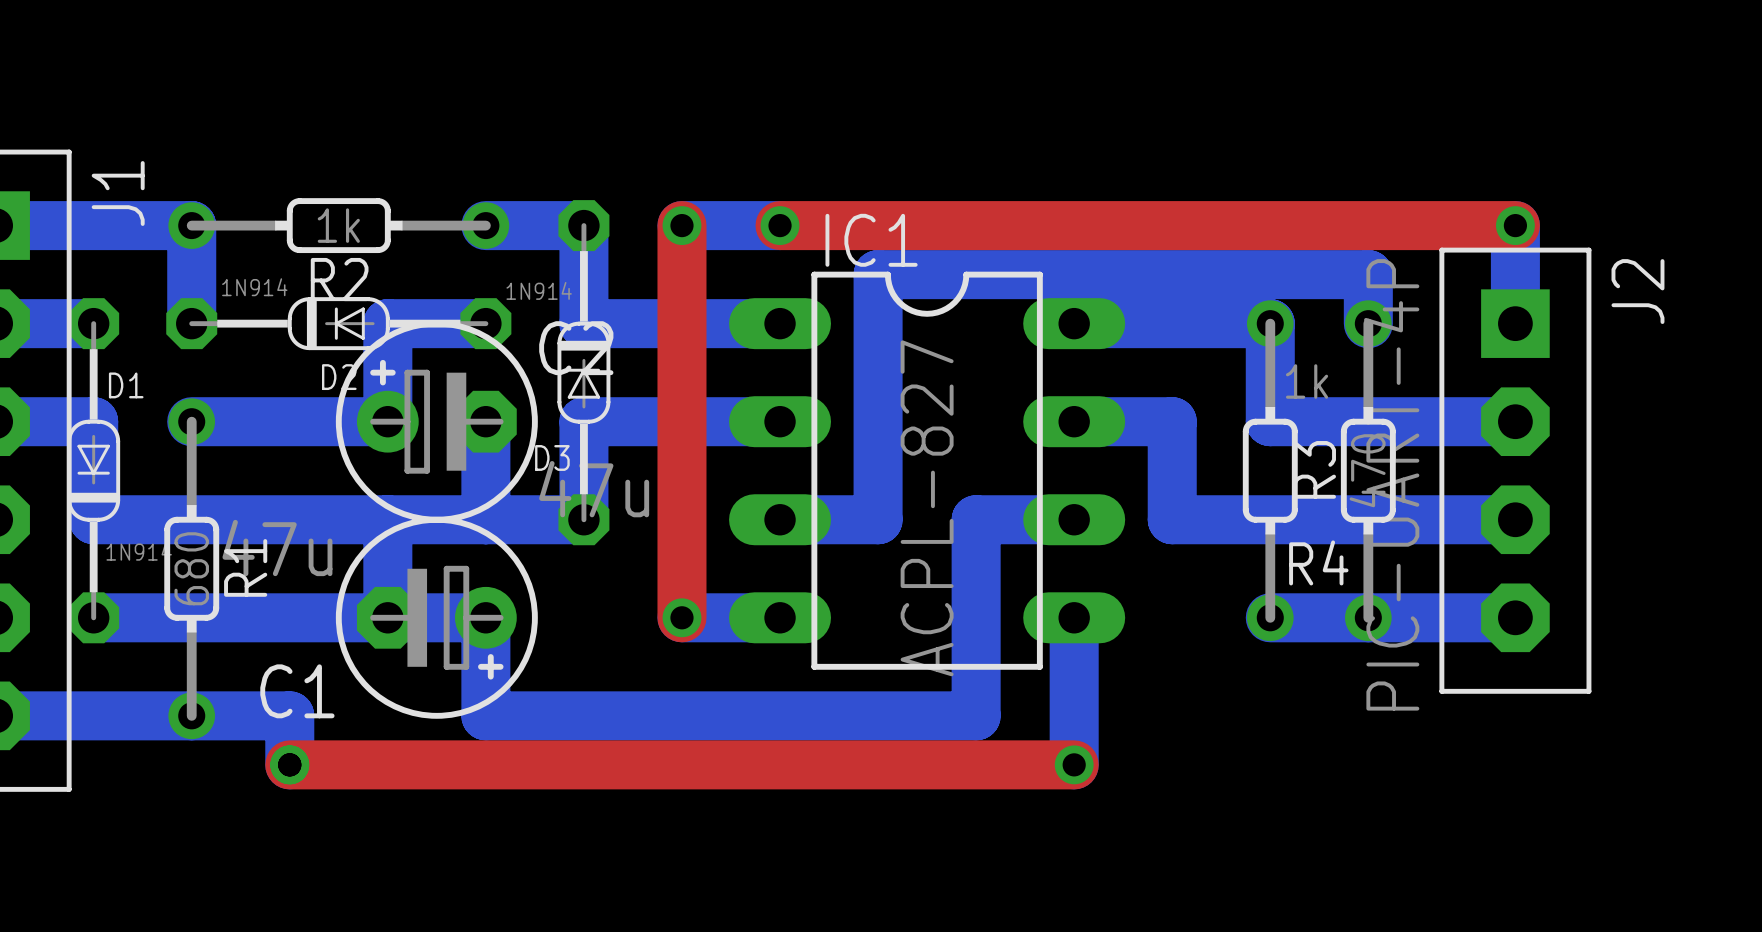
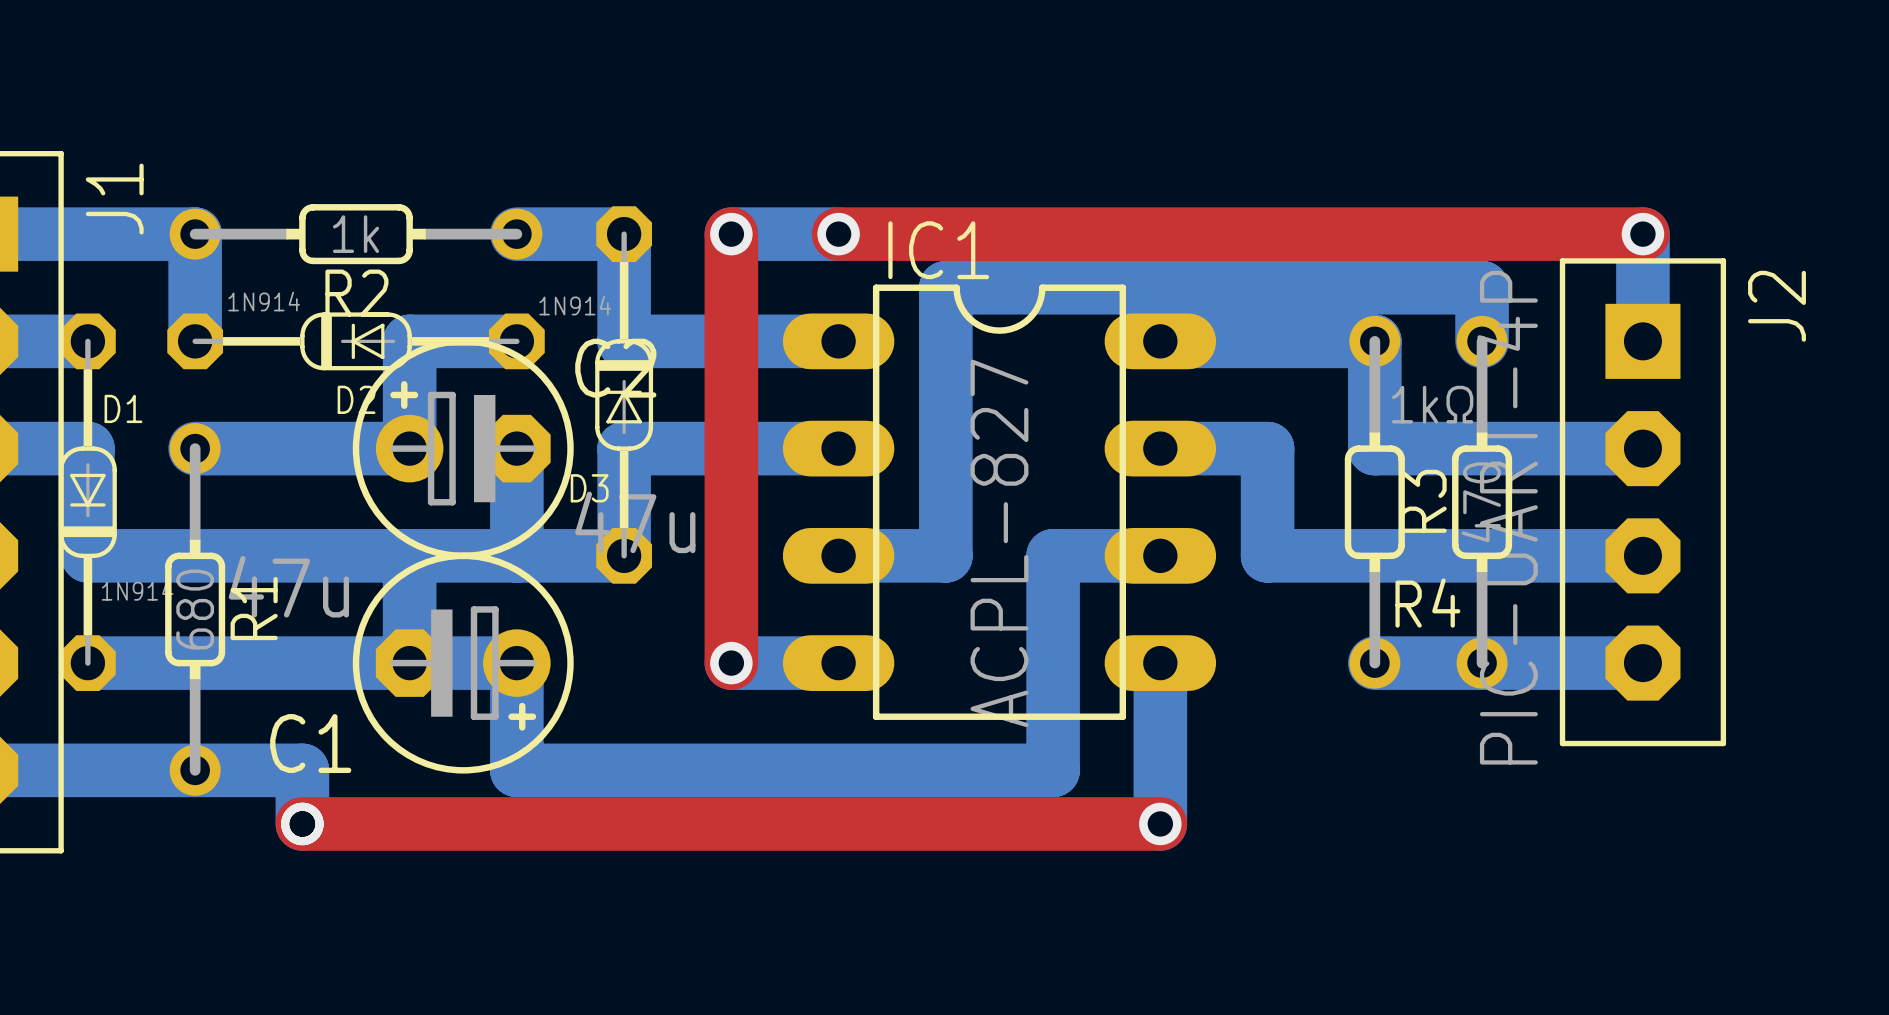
R4 value: 1k (1307, 381) -> 1kΩ (1432, 404)

